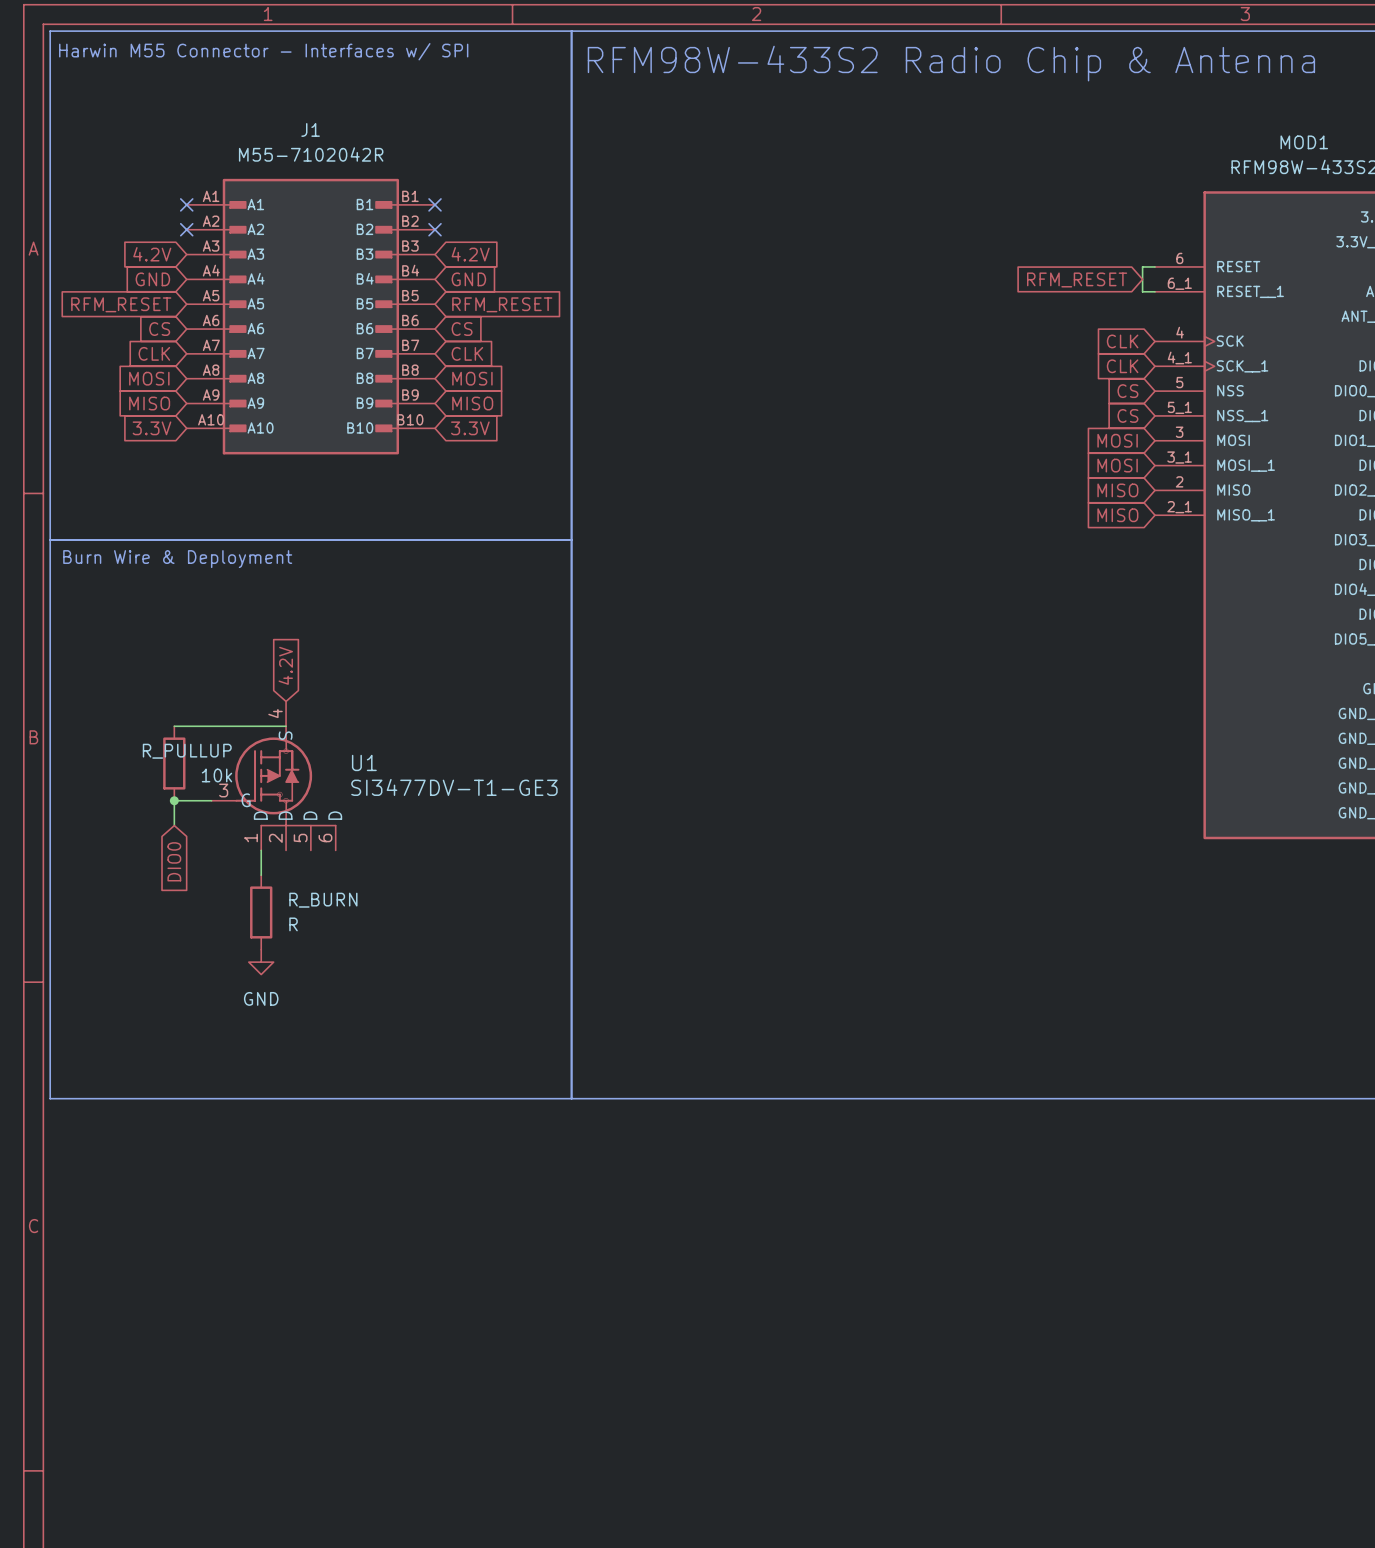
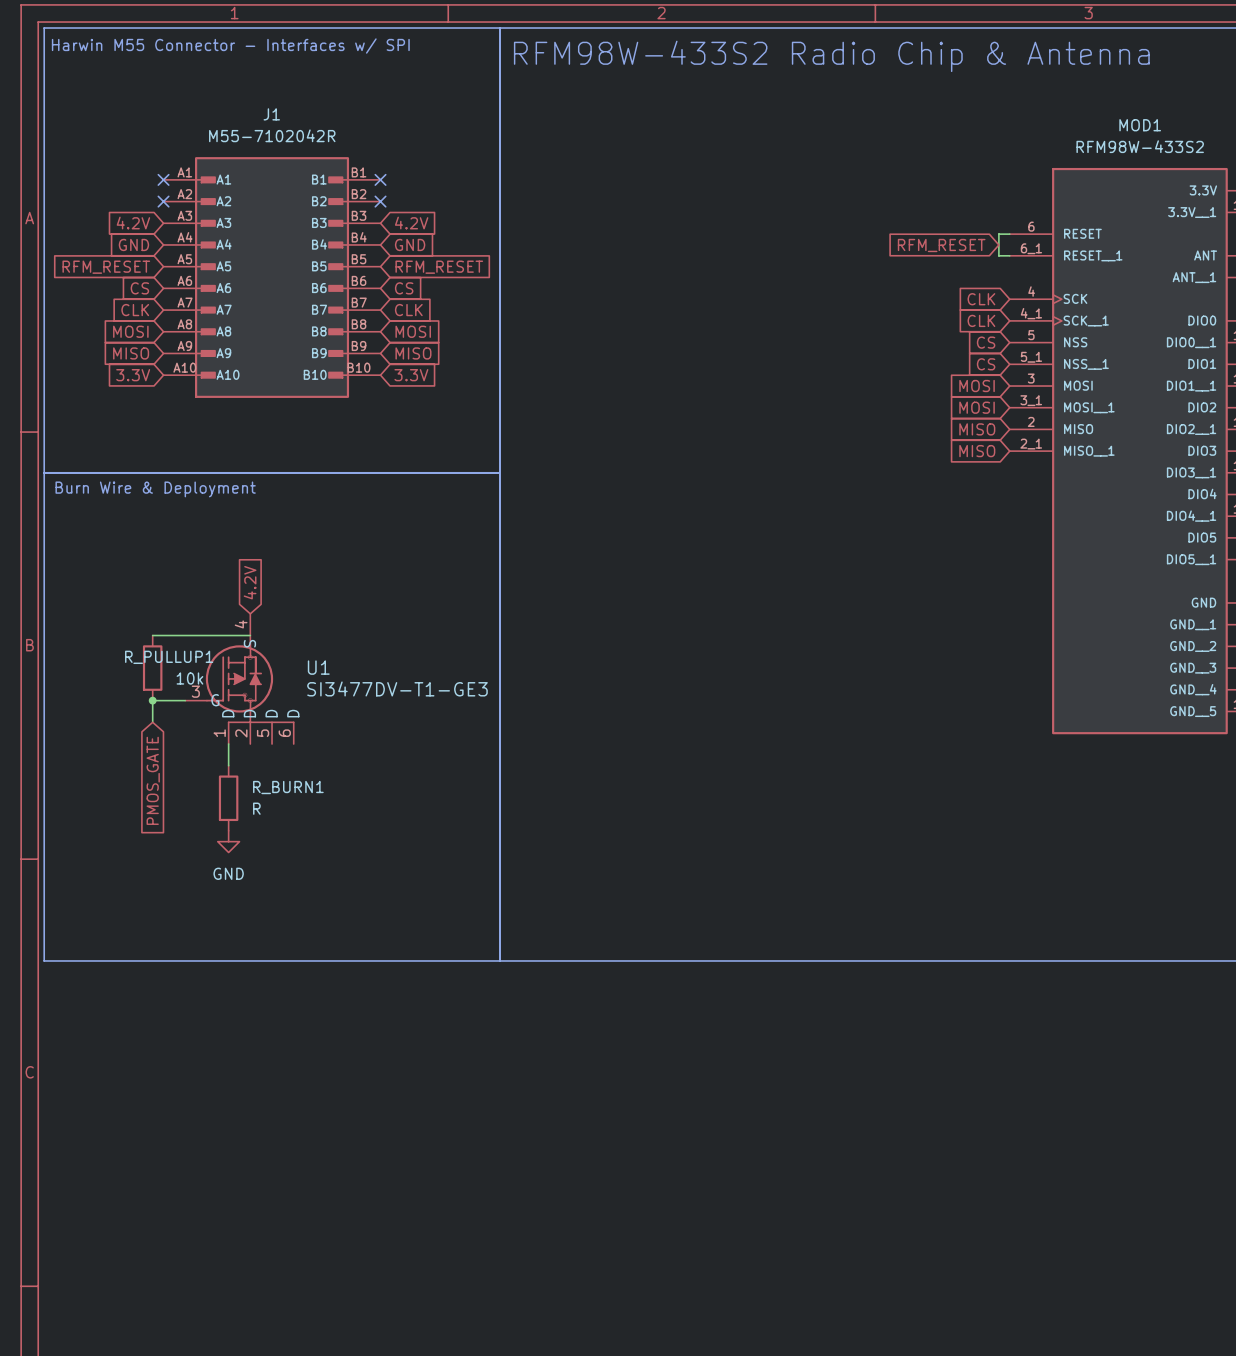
R_PULLUP name: R_PULLUP (187, 751) -> R_PULLUP1 (169, 657)
global label: DIO0 (174, 861) -> PMOS_GATE (153, 780)
R_BURN name: R_BURN (323, 900) -> R_BURN1 (288, 787)

